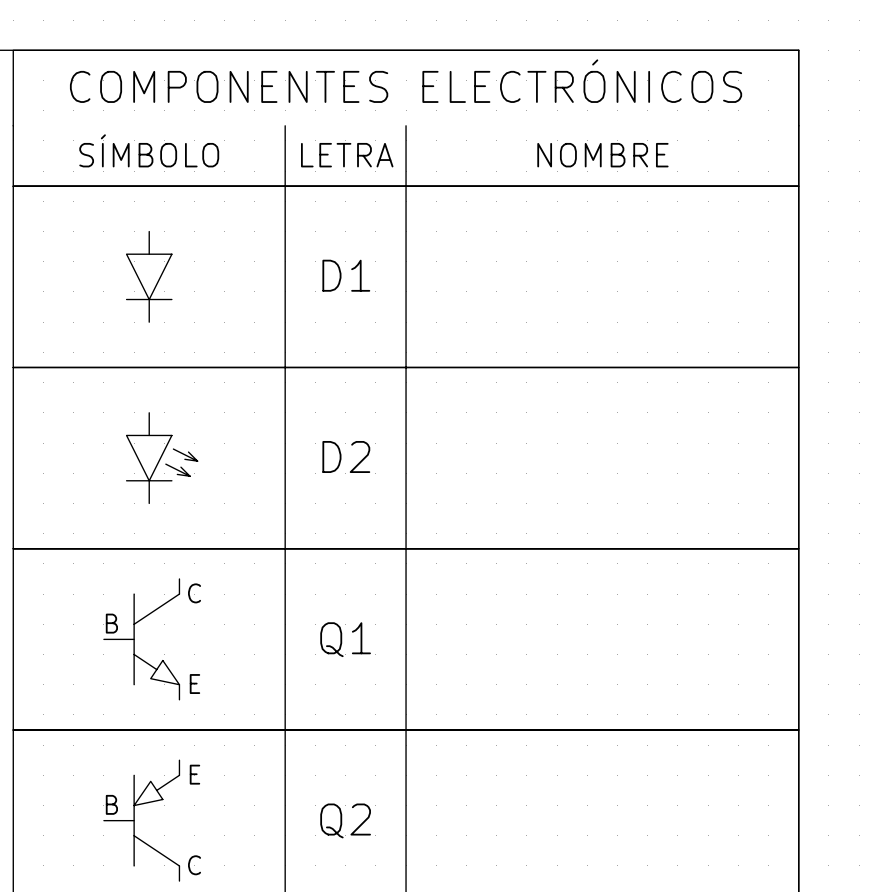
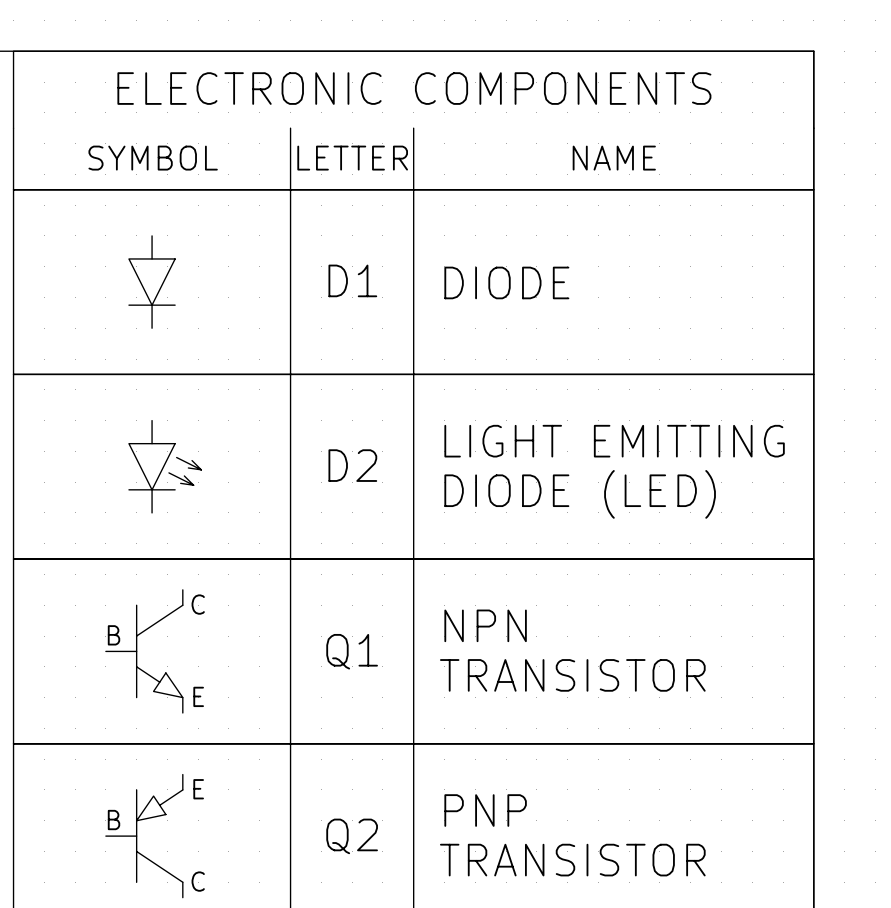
part text: COMPONENTES ELECTRÓNICOS (406, 81) -> ELECTRONIC COMPONENTS (414, 88)
part text: SÍMBOLO (149, 150) -> SYMBOL (153, 158)
part text: LETRA (347, 155) -> LETTER (352, 158)
part text: NOMBRE (602, 155) -> NAME (614, 158)
text: none -> DIODE (506, 282)
text: none -> LIGHT EMITTING (614, 441)
text: none -> DIODE (LED) (580, 494)
text: none -> NPN (485, 625)
text: none -> TRANSISTOR (572, 675)
text: none -> PNP (485, 810)
text: none -> TRANSISTOR (572, 860)

